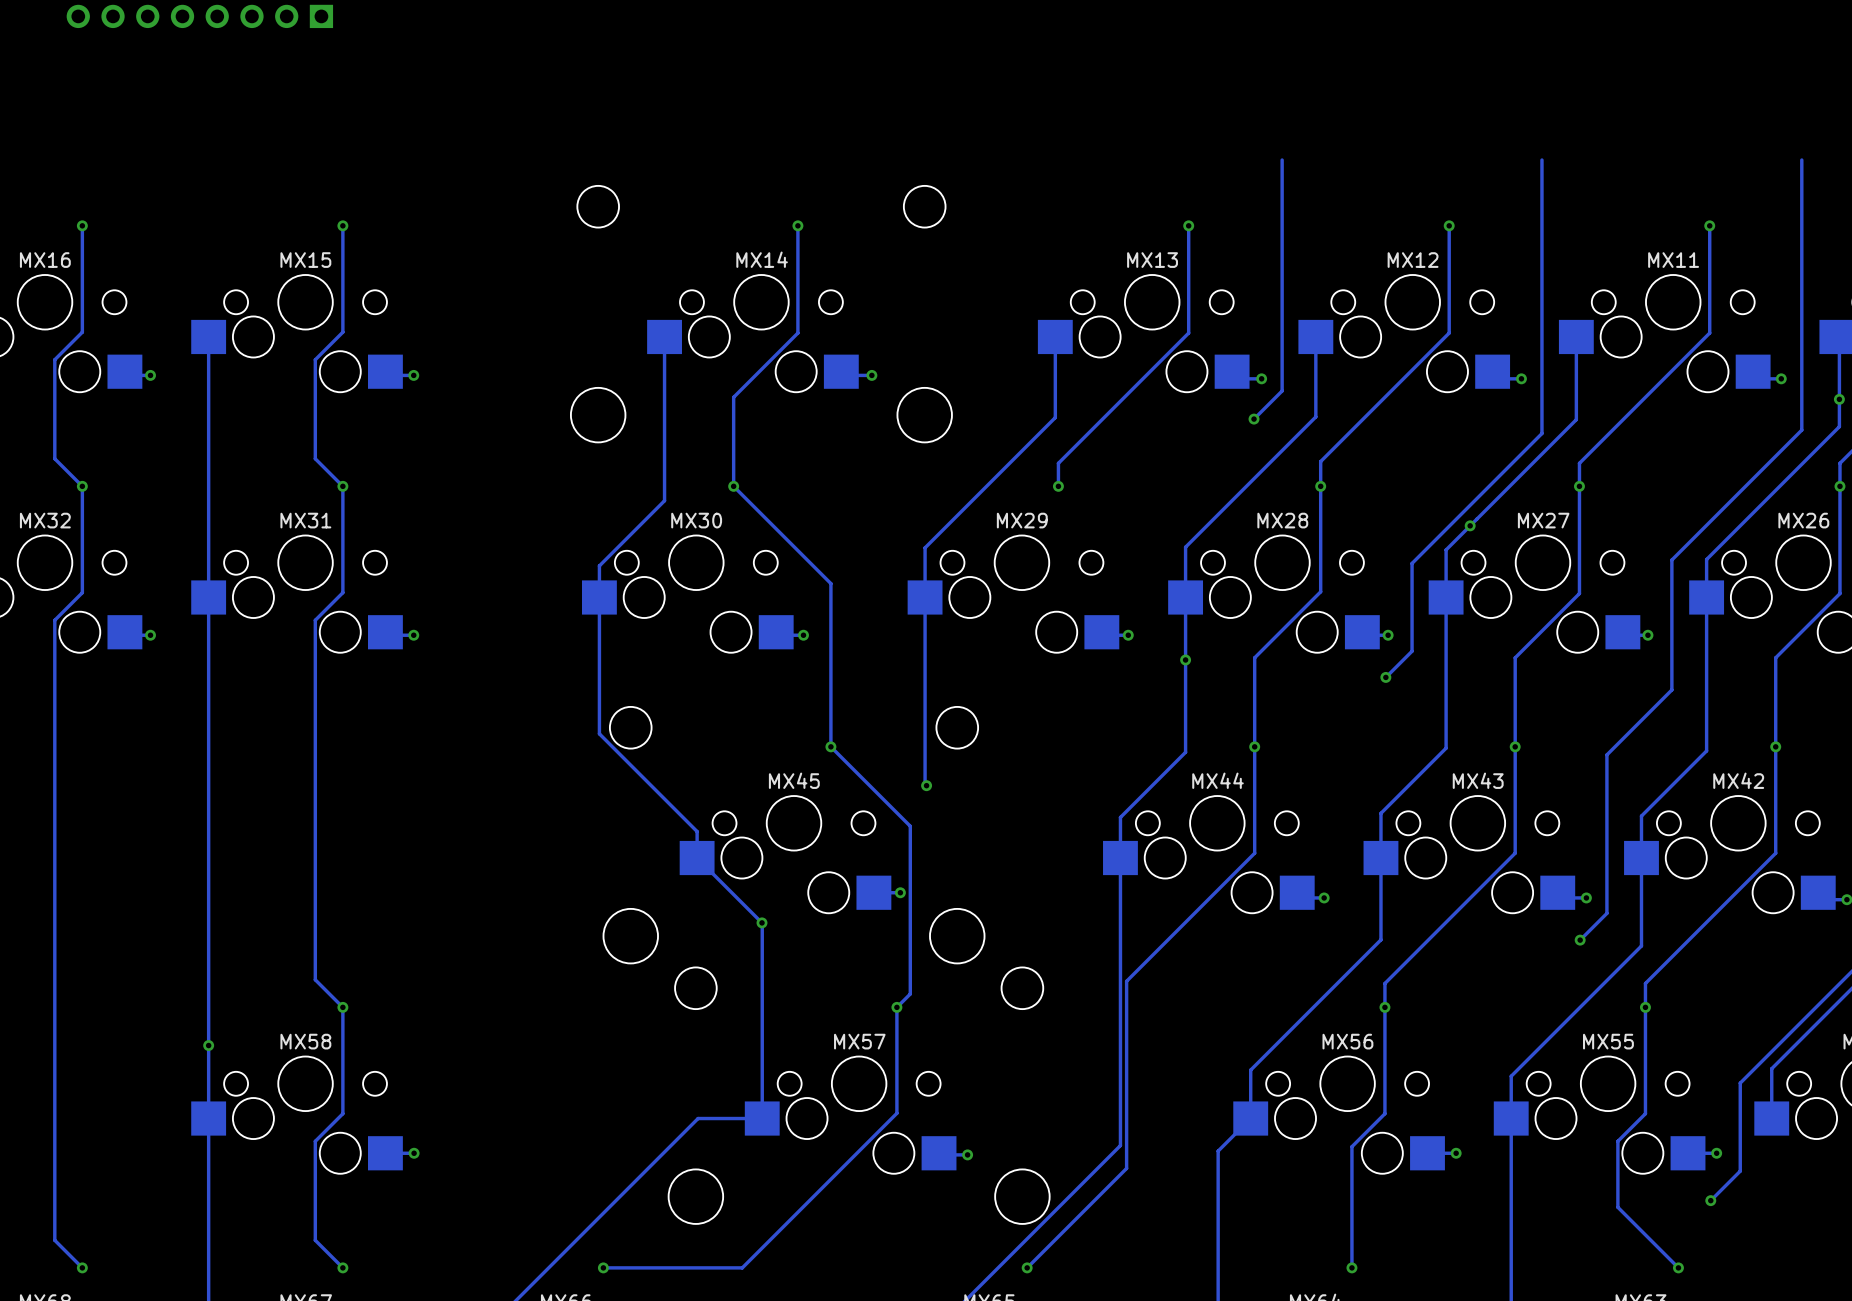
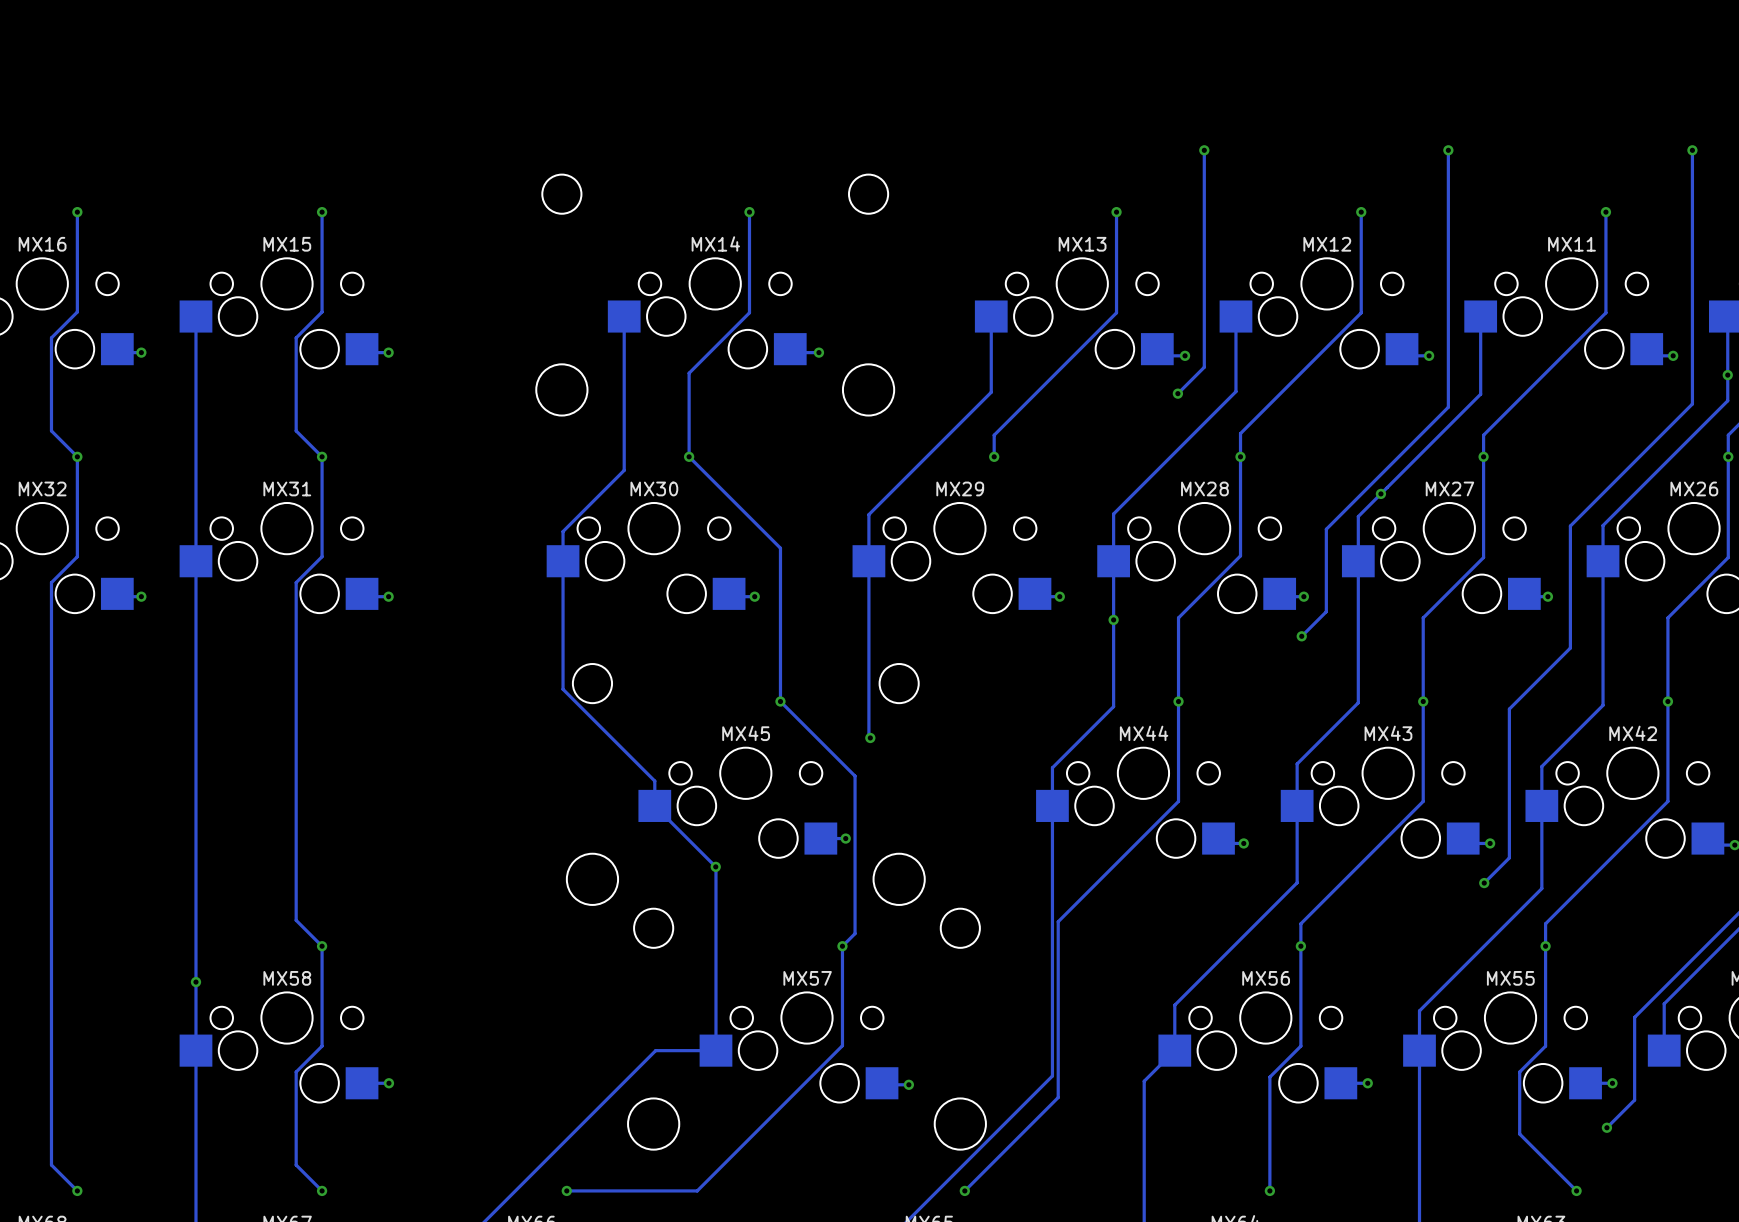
part: (199, 16) -> none
via: none -> (1204, 150)
via: none -> (1448, 150)
via: none -> (1692, 150)

